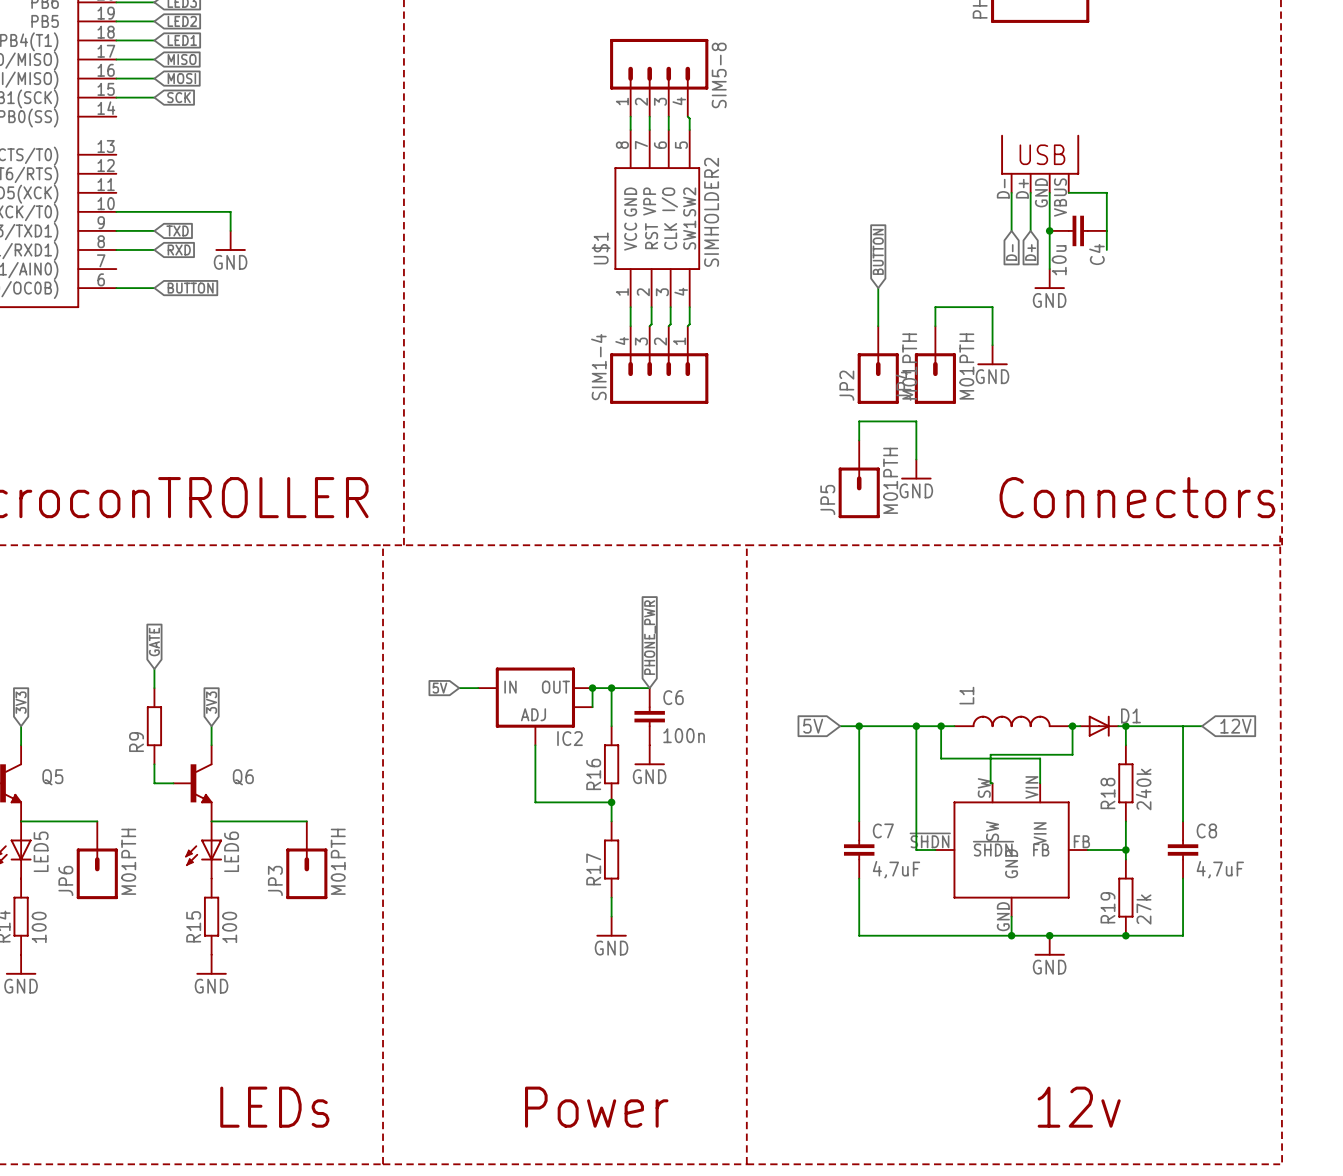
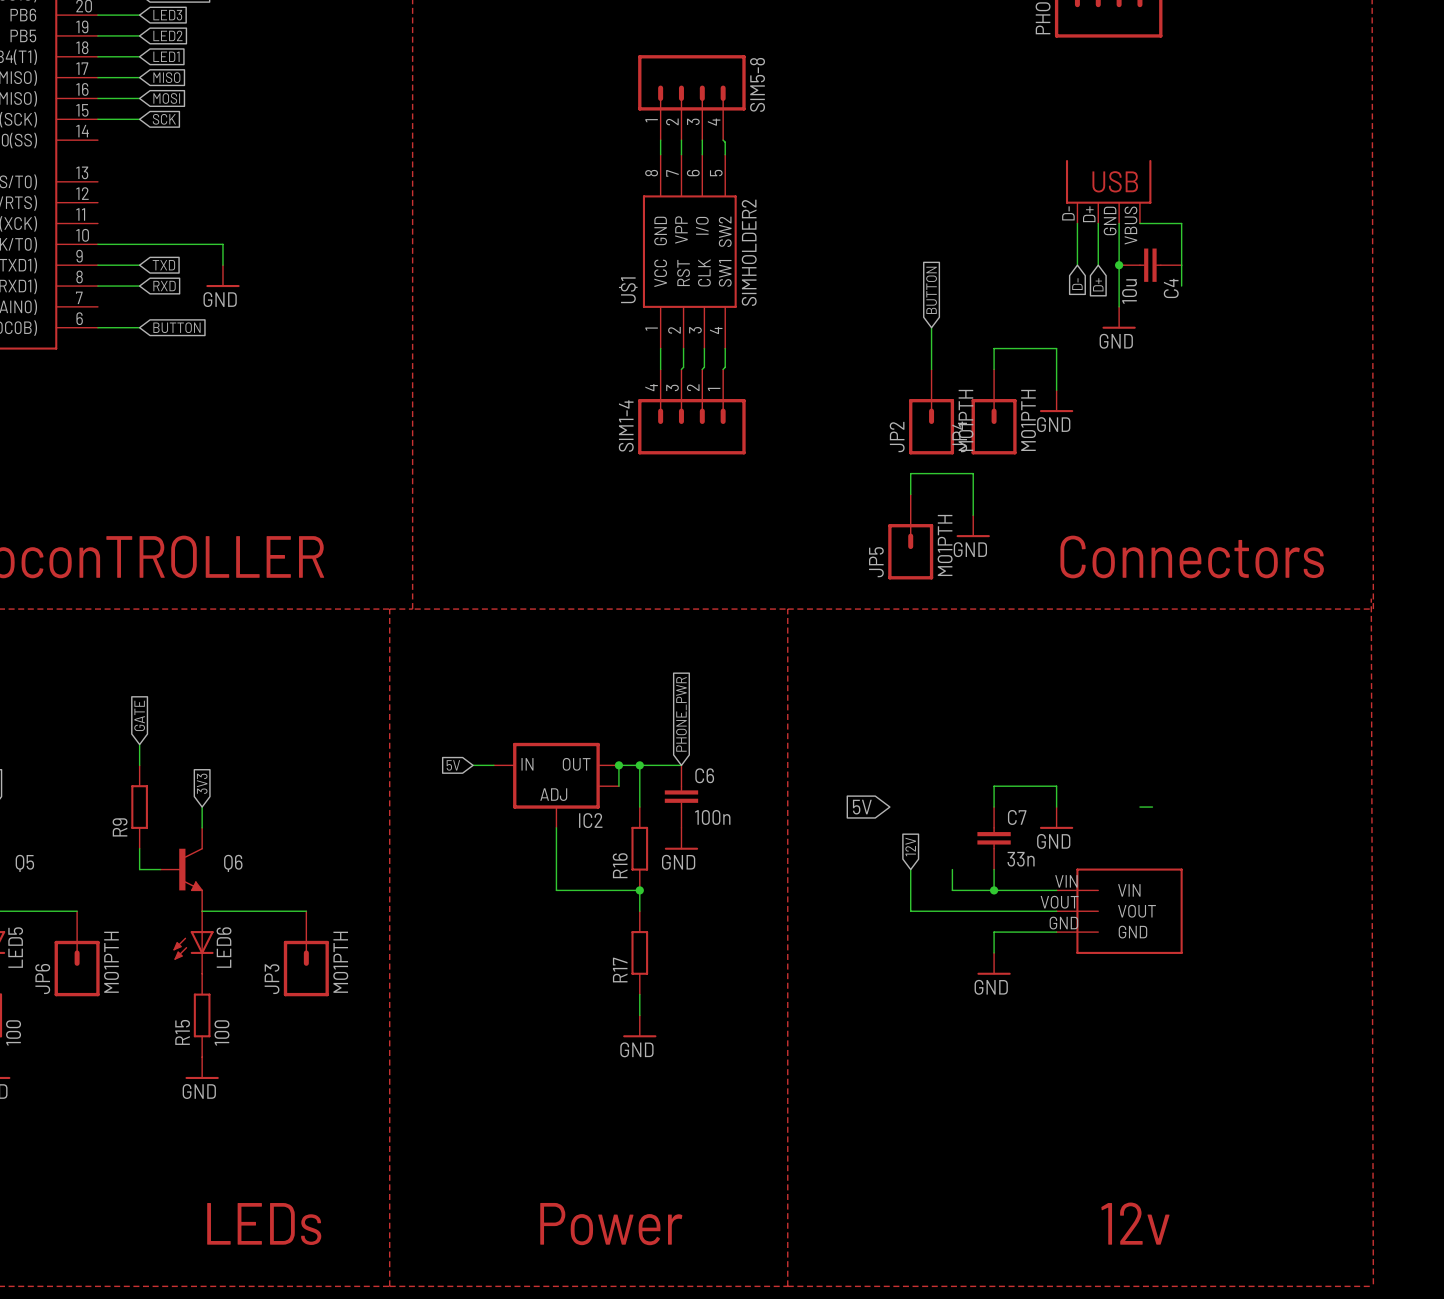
L1: (1011, 721) -> none
wire: (840, 726) (954, 726) -> none
wire: (859, 726) (859, 783) -> none
junction: (859, 726) -> none
wire: (916, 726) (916, 850) (935, 850) -> none
junction: (916, 726) -> none
wire: none -> (994, 807) (994, 786) (1056, 786) (1056, 807)
wire: (941, 726) (941, 758) (1040, 758) (1040, 783) -> none
junction: (941, 726) -> none
wire: (1072, 726) (1072, 754) (990, 754) (990, 783) (992, 783) -> none
junction: (1072, 726) -> none
D1: (1099, 726) -> none
wire: (1118, 726) (1202, 726) -> none
wire: (1125, 726) (1125, 745) -> none
junction: (1125, 726) -> none
wire: (1183, 726) (1183, 821) -> none
global label: 12V (1235, 726) -> none
power symbol: none -> GND (1056, 817)
global label: none -> 12V (910, 847)
wire: none -> (952, 869) (952, 890) (1056, 890)
R18: 240k (1125, 783) -> none
junction: none -> (994, 890)
wire: none -> (910, 911) (1056, 911)
part: none -> (1119, 911)
wire: (1125, 821) (1125, 859) -> none
wire: none -> (1056, 932) (994, 932) (994, 952)
C7 position: (859, 850) -> (994, 838)
part: (1011, 850) -> none
wire: (1087, 850) (1125, 850) -> none
junction: (1125, 850) -> none
C8: 4,7uF (1183, 850) -> none
C7 value: 4,7uF (896, 869) -> 33n (1021, 859)
power symbol: none -> GND (994, 963)
wire: (859, 878) (859, 935) (1183, 935) (1183, 878) -> none
R19: 27k (1125, 897) -> none
wire: (1011, 916) (1011, 935) -> (994, 869) (994, 890)
junction: (1011, 935) -> none
junction: (1049, 935) -> none
junction: (1125, 935) -> none
power symbol: GND (1049, 945) -> none

